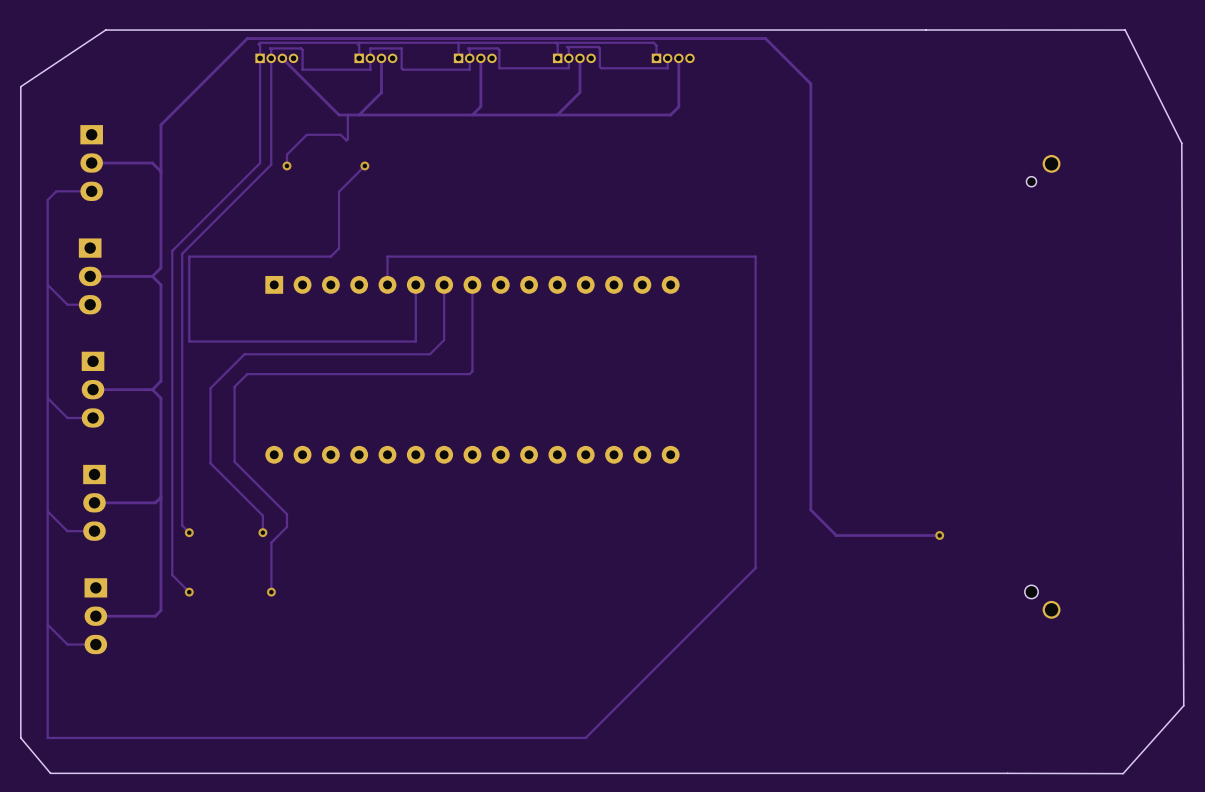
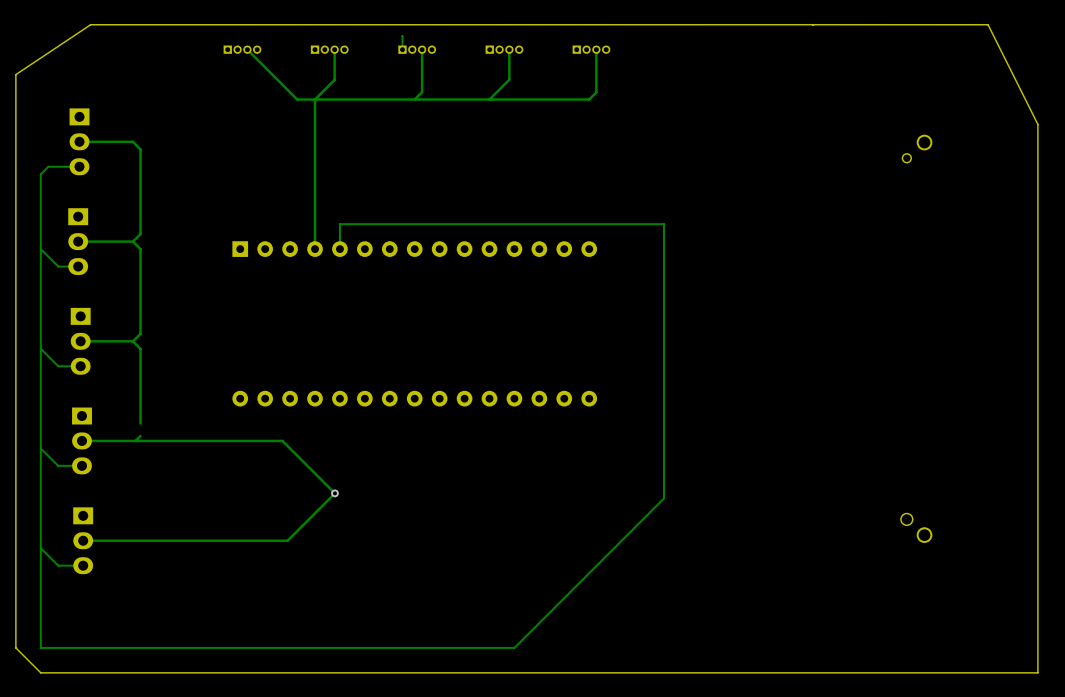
board edge: (1123, 30) (1181, 143) (1183, 705) (1123, 773) (50, 773) (20, 737) (20, 86) (105, 30) -> (988, 24) (1037, 124) (1037, 672) (40, 672) (15, 647) (15, 74) (91, 24)
track: (359, 42) (359, 58) -> none
track: (555, 42) (557, 58) -> none
track: (656, 58) (656, 45) (653, 42) (258, 44) (260, 163) (172, 250) (172, 575) (189, 592) -> none
track: (667, 58) (667, 68) (601, 68) (598, 47) (567, 47) (568, 68) -> none
track: (568, 68) (499, 68) (497, 48) (468, 48) (469, 69) -> none
track: (469, 69) (403, 69) (401, 48) (370, 48) (370, 69) (302, 69) (301, 48) (269, 48) (271, 164) (182, 253) (182, 525) (189, 532) -> none
track: (347, 114) (346, 140) (340, 134) (306, 134) (286, 154) (286, 165) -> none
track: none -> (315, 99) (315, 249)
via: (286, 165) -> none
track: (364, 165) (339, 191) (339, 248) (330, 256) (189, 256) (189, 341) (415, 341) (415, 284) -> none
via: (364, 165) -> none
track: (160, 171) (160, 124) (247, 38) (765, 38) (810, 83) (810, 510) (836, 535) (939, 535) -> none
track: (444, 284) (444, 340) (429, 354) (244, 354) (210, 388) (210, 463) (262, 515) (262, 532) -> none
track: (472, 284) (472, 371) (469, 374) (247, 374) (234, 386) (234, 461) (286, 514) (286, 527) (271, 542) (271, 592) -> none
track: (160, 483) (160, 610) (155, 616) -> (135, 440) (282, 440) (334, 493) (287, 540) (135, 540)
via: (189, 532) -> none
via: (262, 532) -> none
via: (939, 535) -> none
via: none -> (334, 493)
via: (189, 592) -> none
via: (271, 592) -> none

